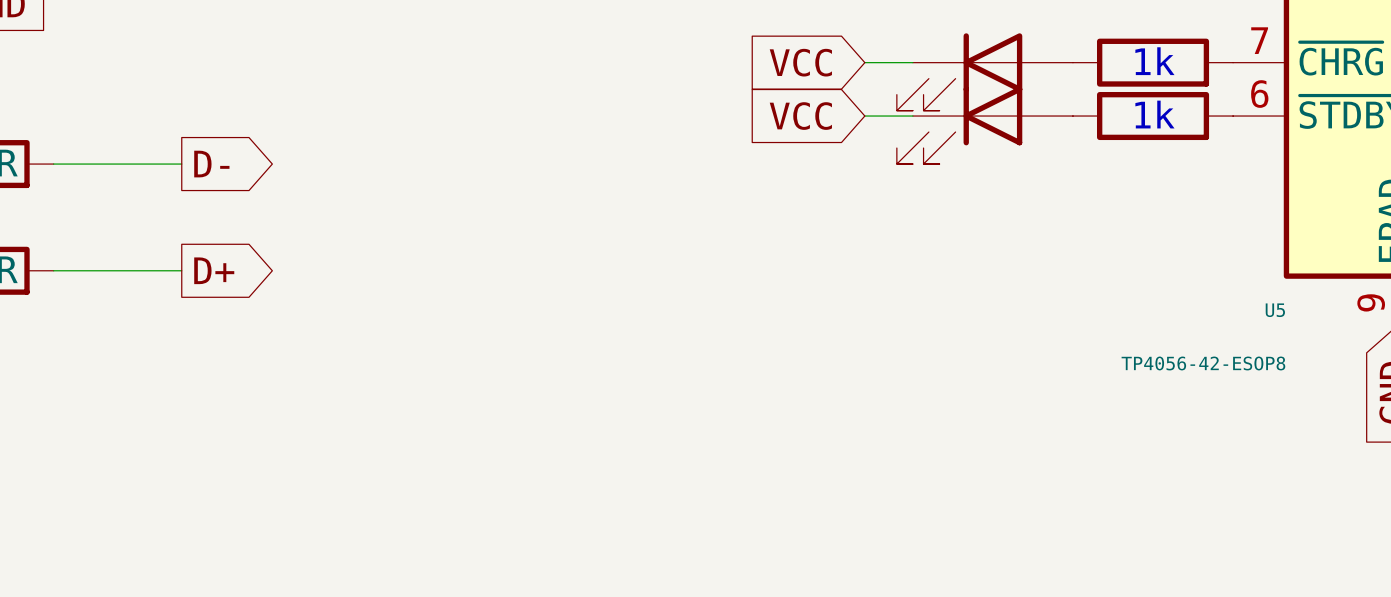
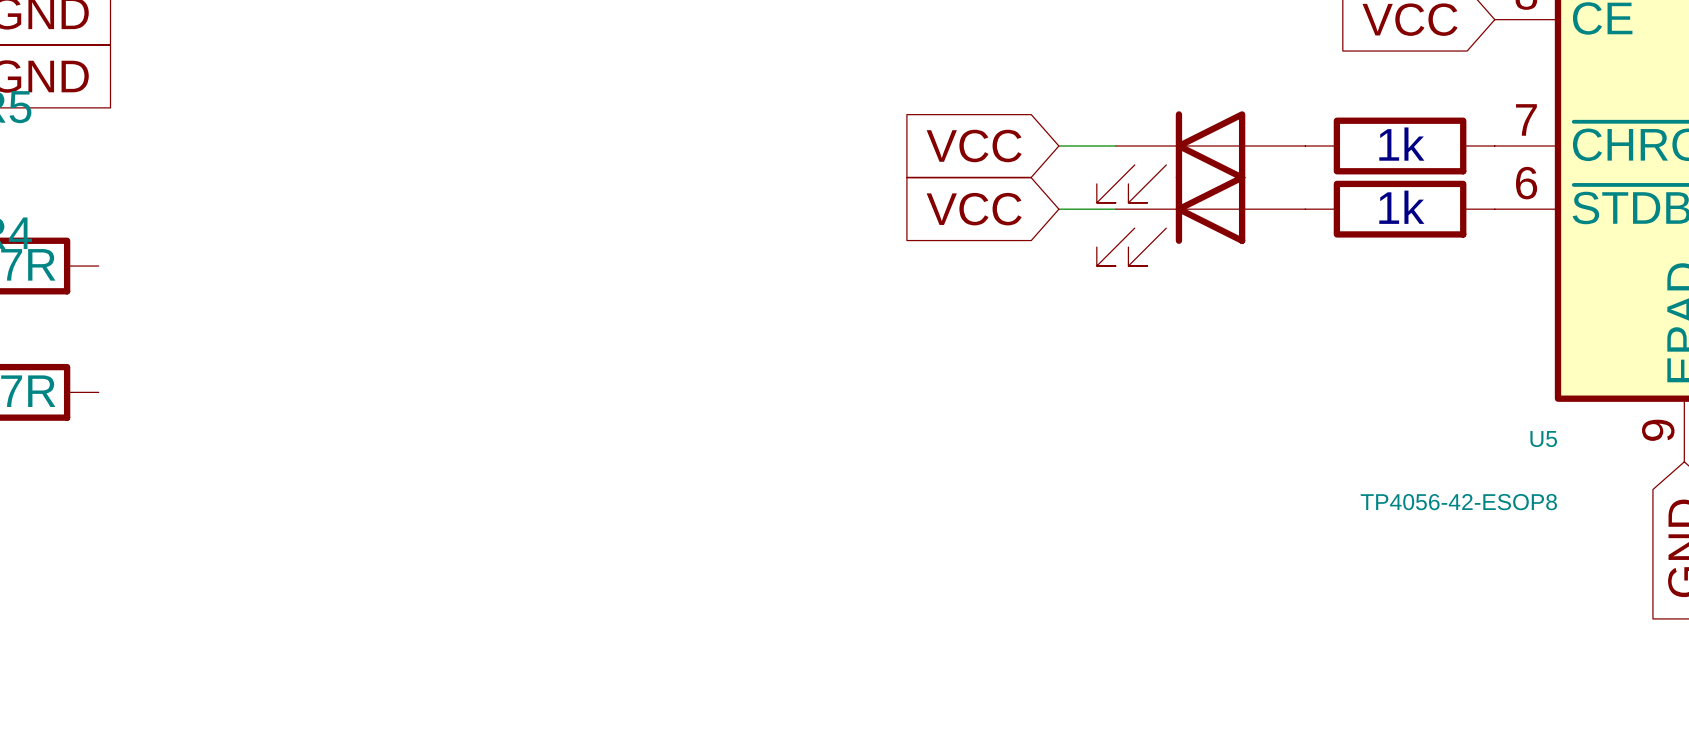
wire: (53, 164) (181, 164) -> none
global label: D- (211, 164) -> none
wire: (53, 270) (181, 270) -> none
global label: D+ (214, 270) -> none

